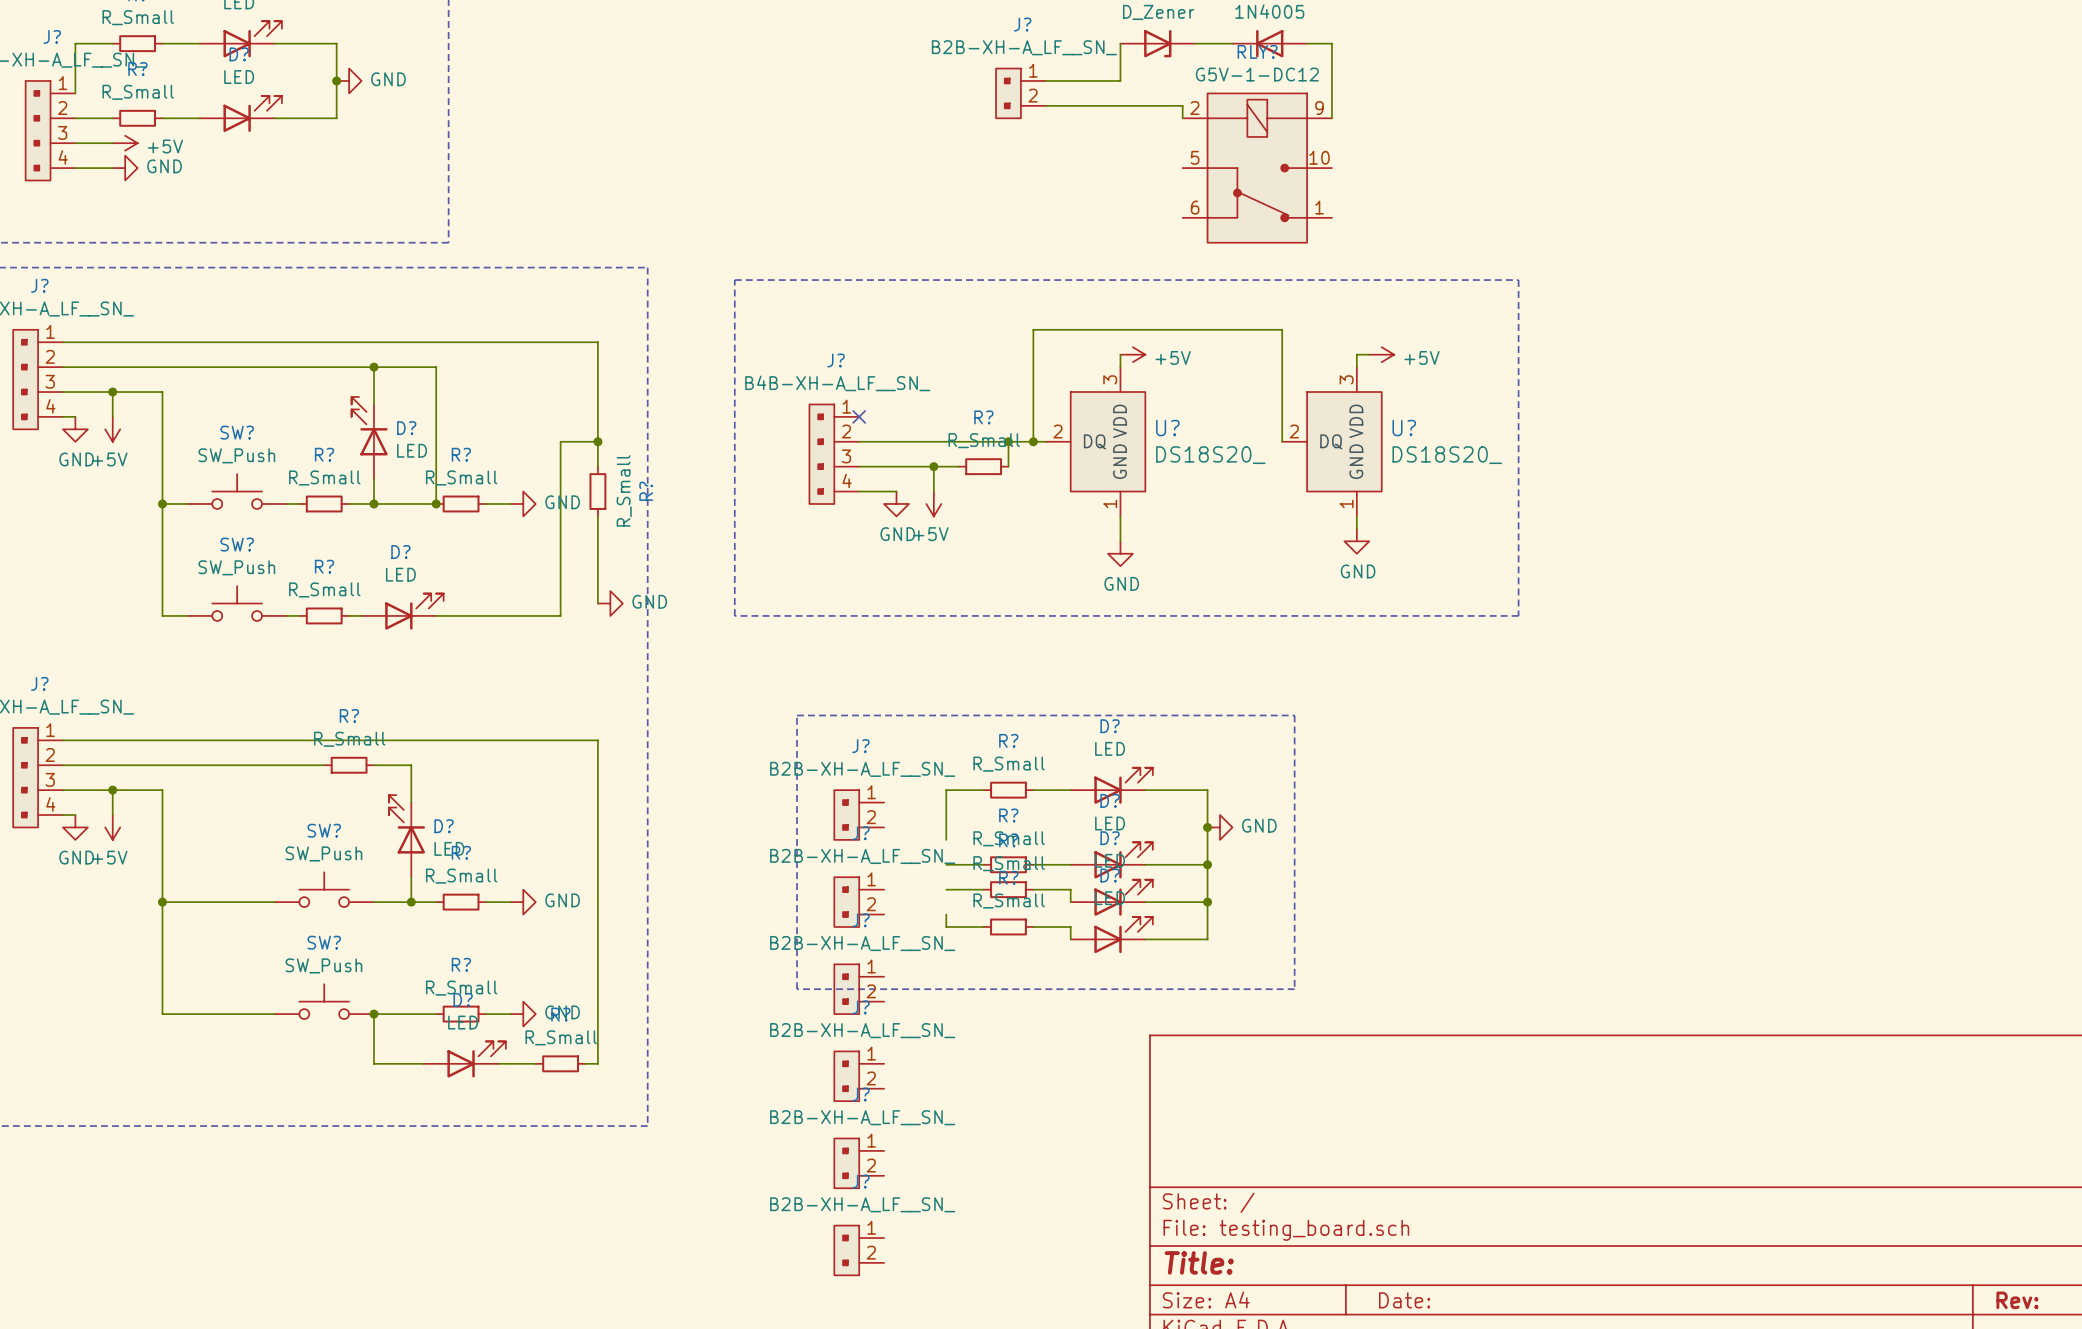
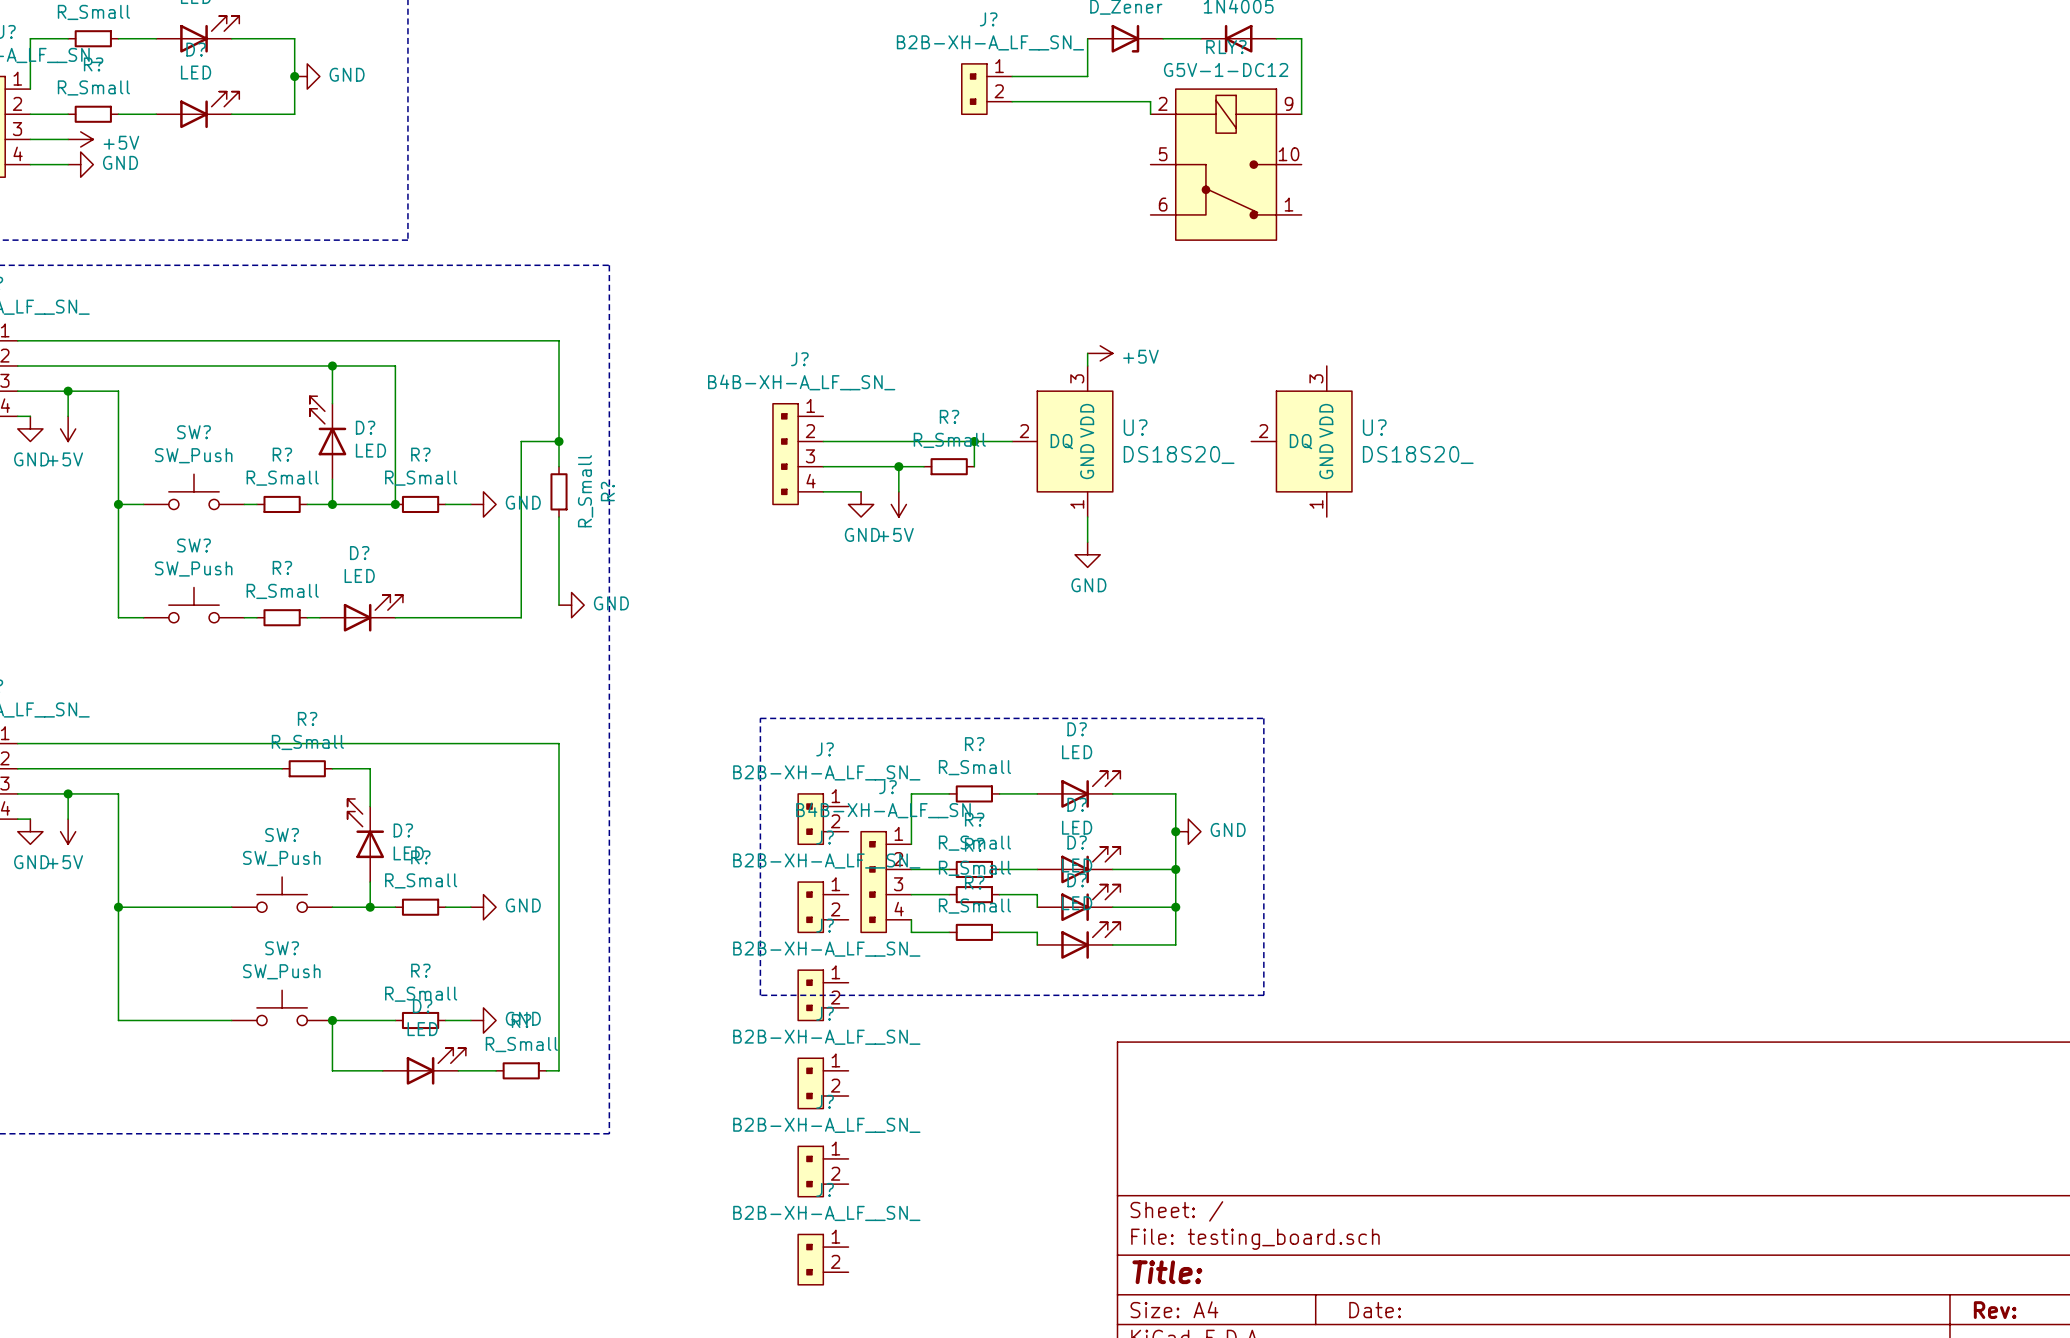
line: (734, 280) (734, 615) (1518, 615) (1518, 280) (734, 280) -> none
wire: (1369, 354) (1356, 354) (1356, 367) -> none
power symbol: +5V (1381, 354) -> none
no-connect mark: (859, 416) -> none
wire: (1033, 441) (1033, 329) (1282, 329) (1282, 441) -> none
junction: (1033, 441) -> none
wire: (1356, 516) (1356, 528) -> none
power symbol: GND (1356, 541) -> none
J?: none -> B4B-XH-A_LF__SN_ (886, 882)

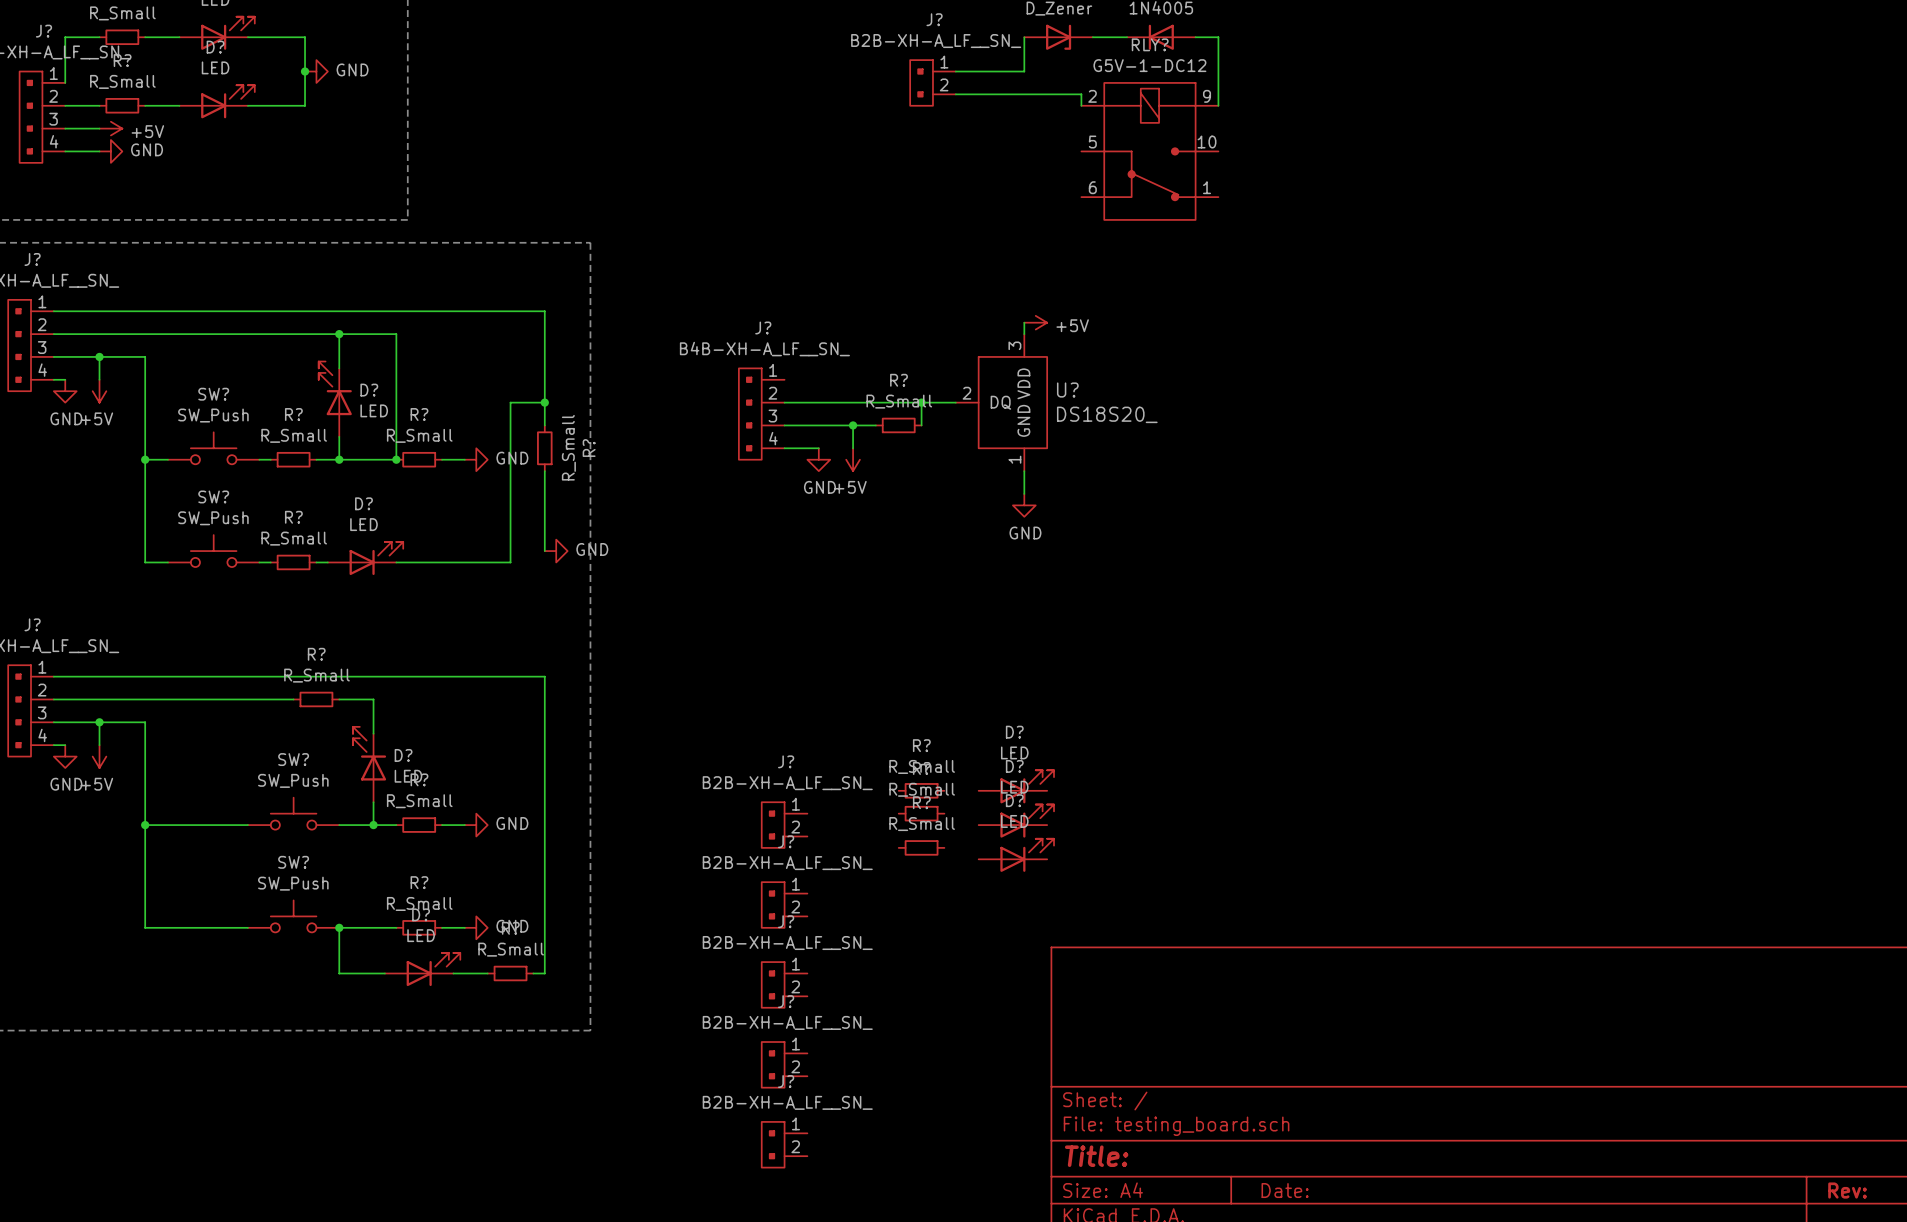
U?: DS18S20_ (1301, 441) -> none
line: (760, 718) (1263, 718) (1263, 995) (760, 995) (760, 718) -> none
D?: LED (1078, 789) -> none
wire: (949, 793) (911, 793) (911, 844) -> none
R?: R_Small (974, 793) -> none
wire: (999, 793) (1037, 793) -> none
wire: (1112, 793) (1175, 793) (1175, 944) (1112, 944) -> none
J?: B2B-XH-A_LF__SN_ (823, 819) -> none
junction: (1175, 831) -> none
power symbol: GND (1188, 831) -> none
wire: (911, 869) (949, 869) -> none
wire: (999, 869) (1037, 869) -> none
wire: (1112, 869) (1175, 869) -> none
junction: (1175, 869) -> none
J?: B4B-XH-A_LF__SN_ (886, 882) -> none
wire: (911, 894) (949, 894) -> none
wire: (999, 894) (1037, 894) (1037, 907) -> none
wire: (1112, 907) (1175, 907) -> none
junction: (1175, 907) -> none
wire: (911, 919) (911, 932) (949, 932) -> none
wire: (999, 932) (1037, 932) (1037, 944) -> none

